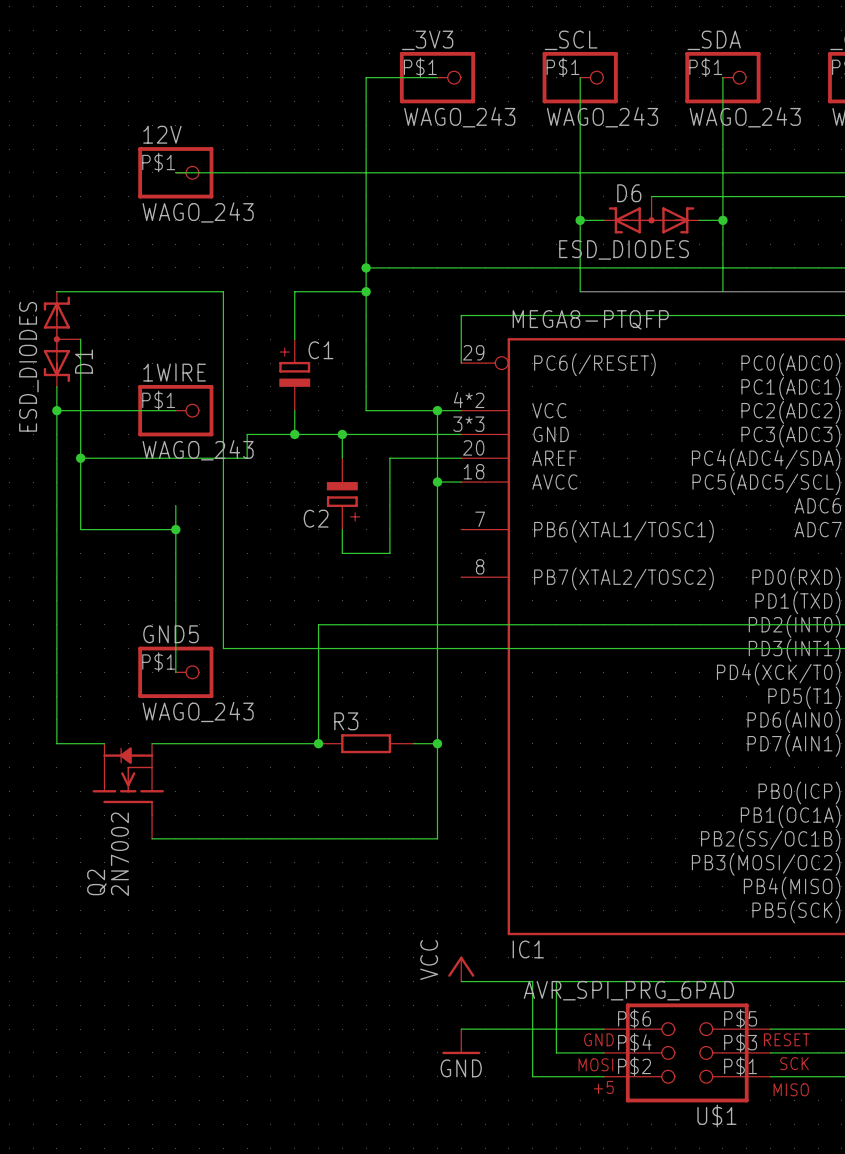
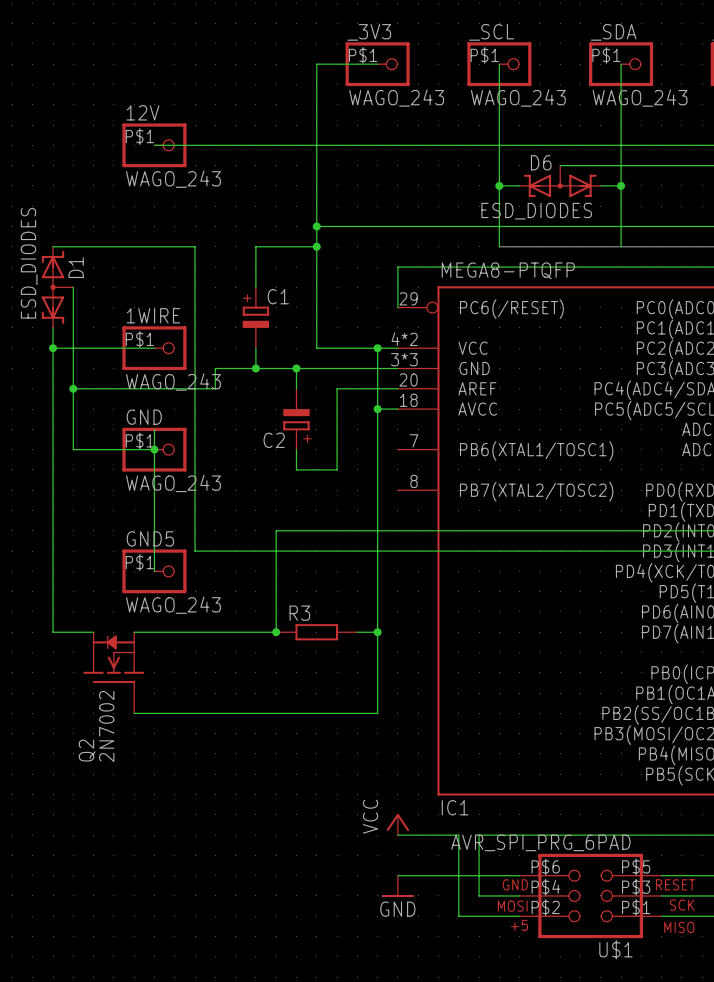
D1 name position: D1 (83, 361) -> D1 (76, 267)
D1 value position: ESD_DIODES (28, 366) -> ESD_DIODES (29, 263)
GND: none -> WAGO_243 (154, 449)

